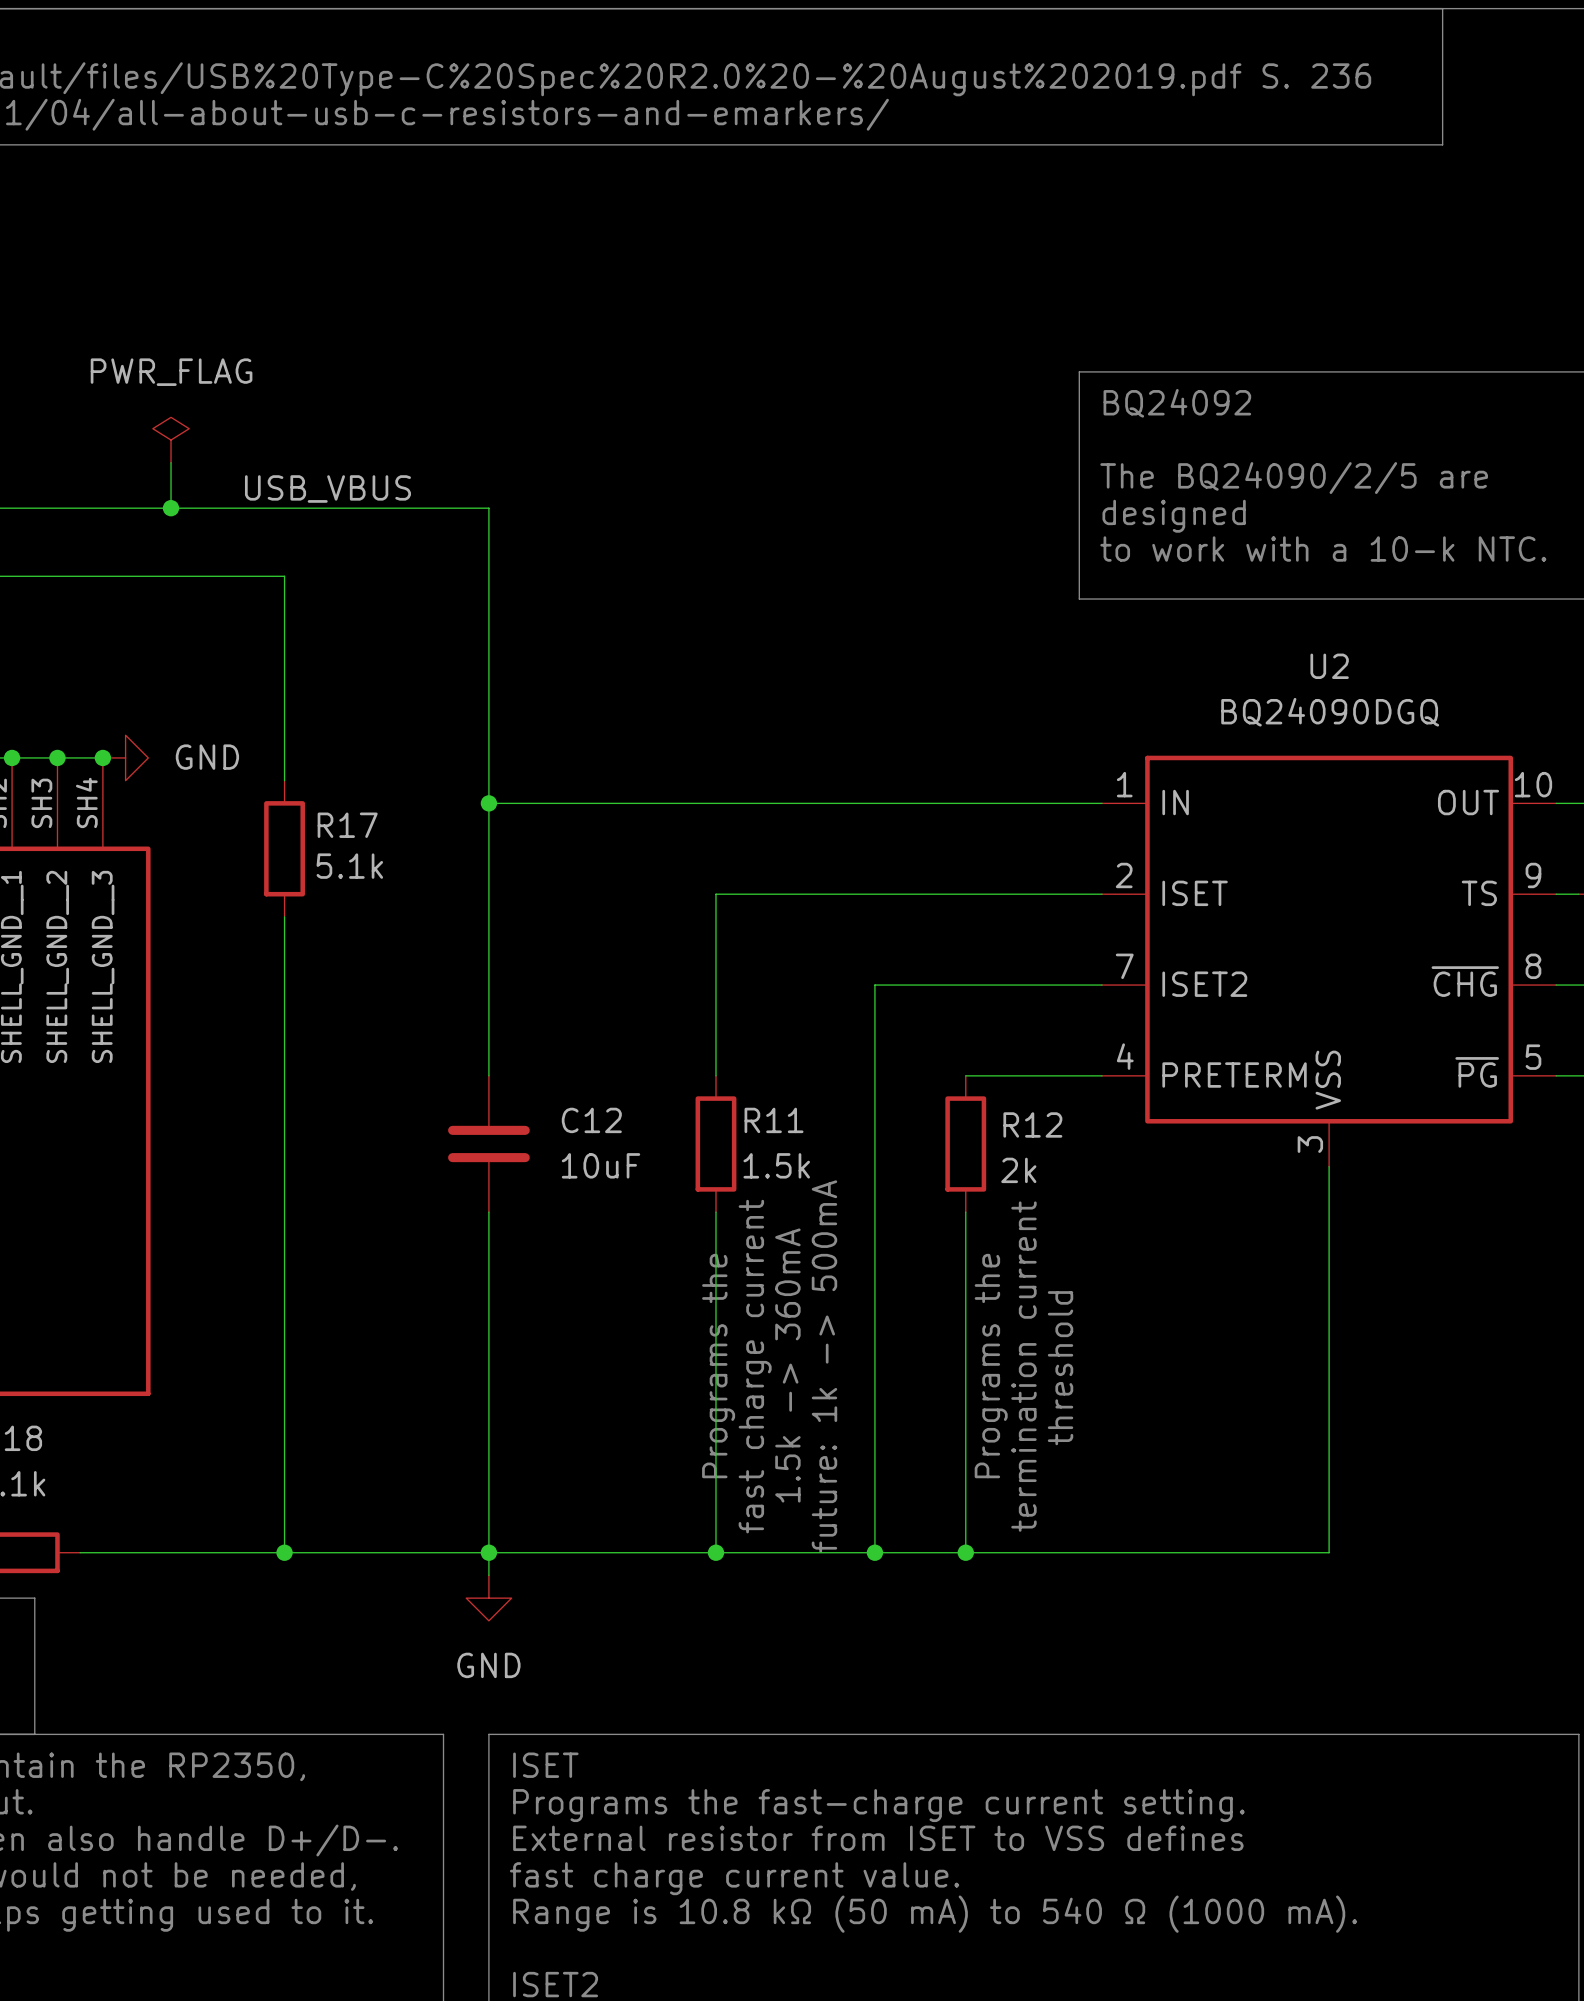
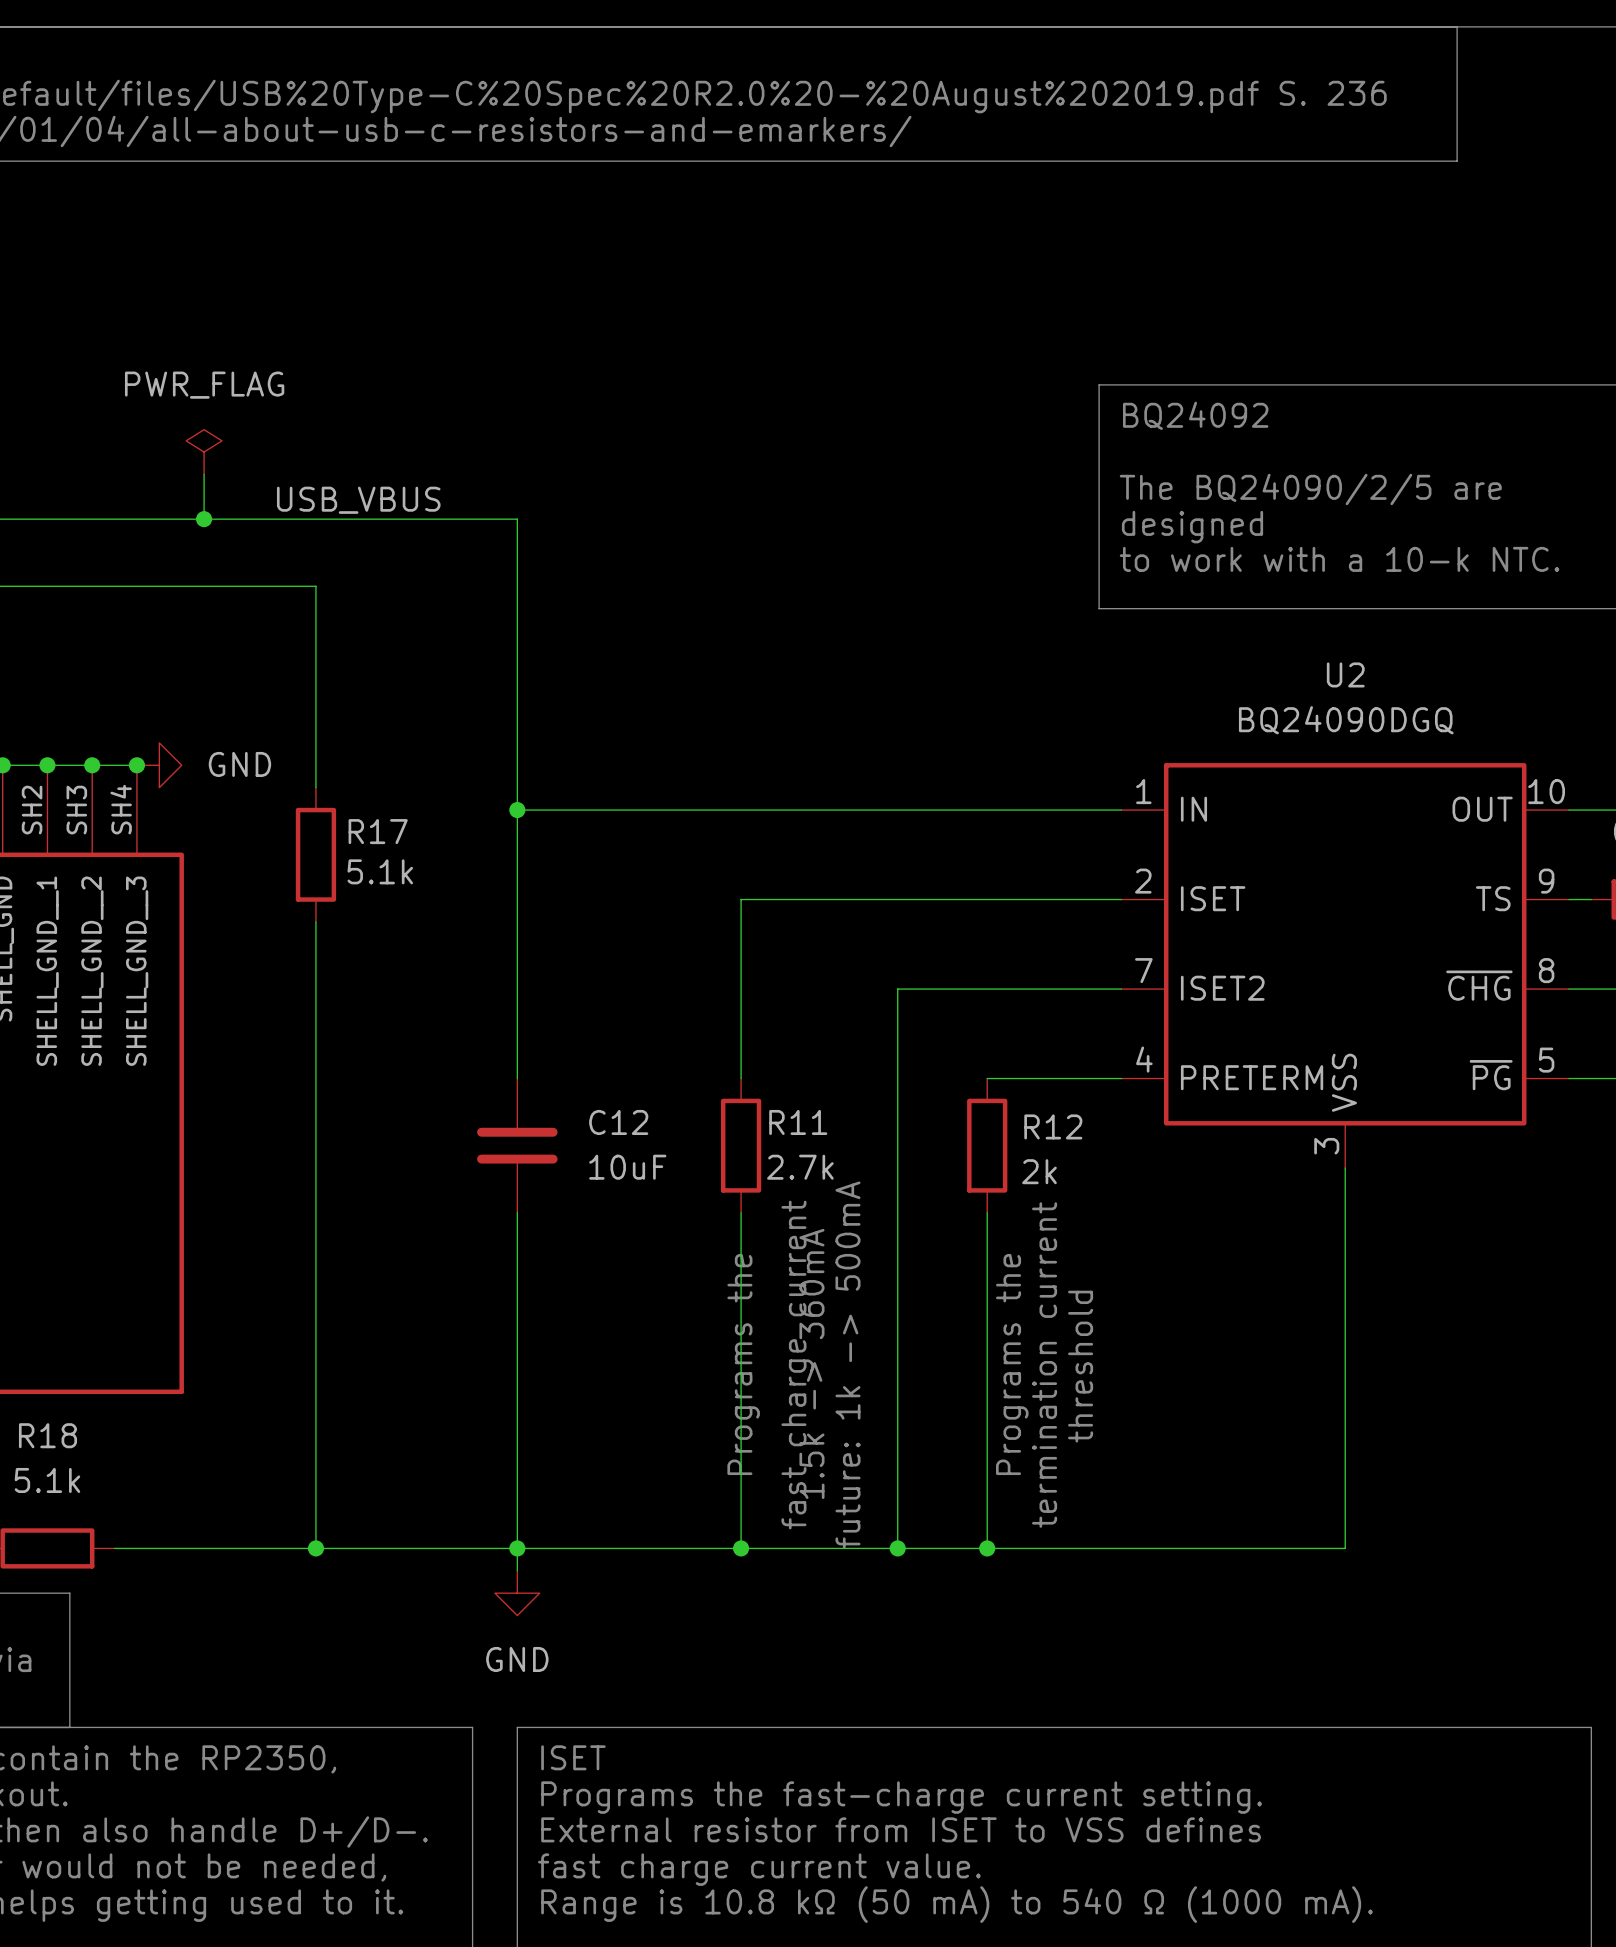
R11 value: 1.5k (776, 1165) -> 2.7k (800, 1167)
text position: fast charge current (755, 1366) -> fast charge current (797, 1365)

